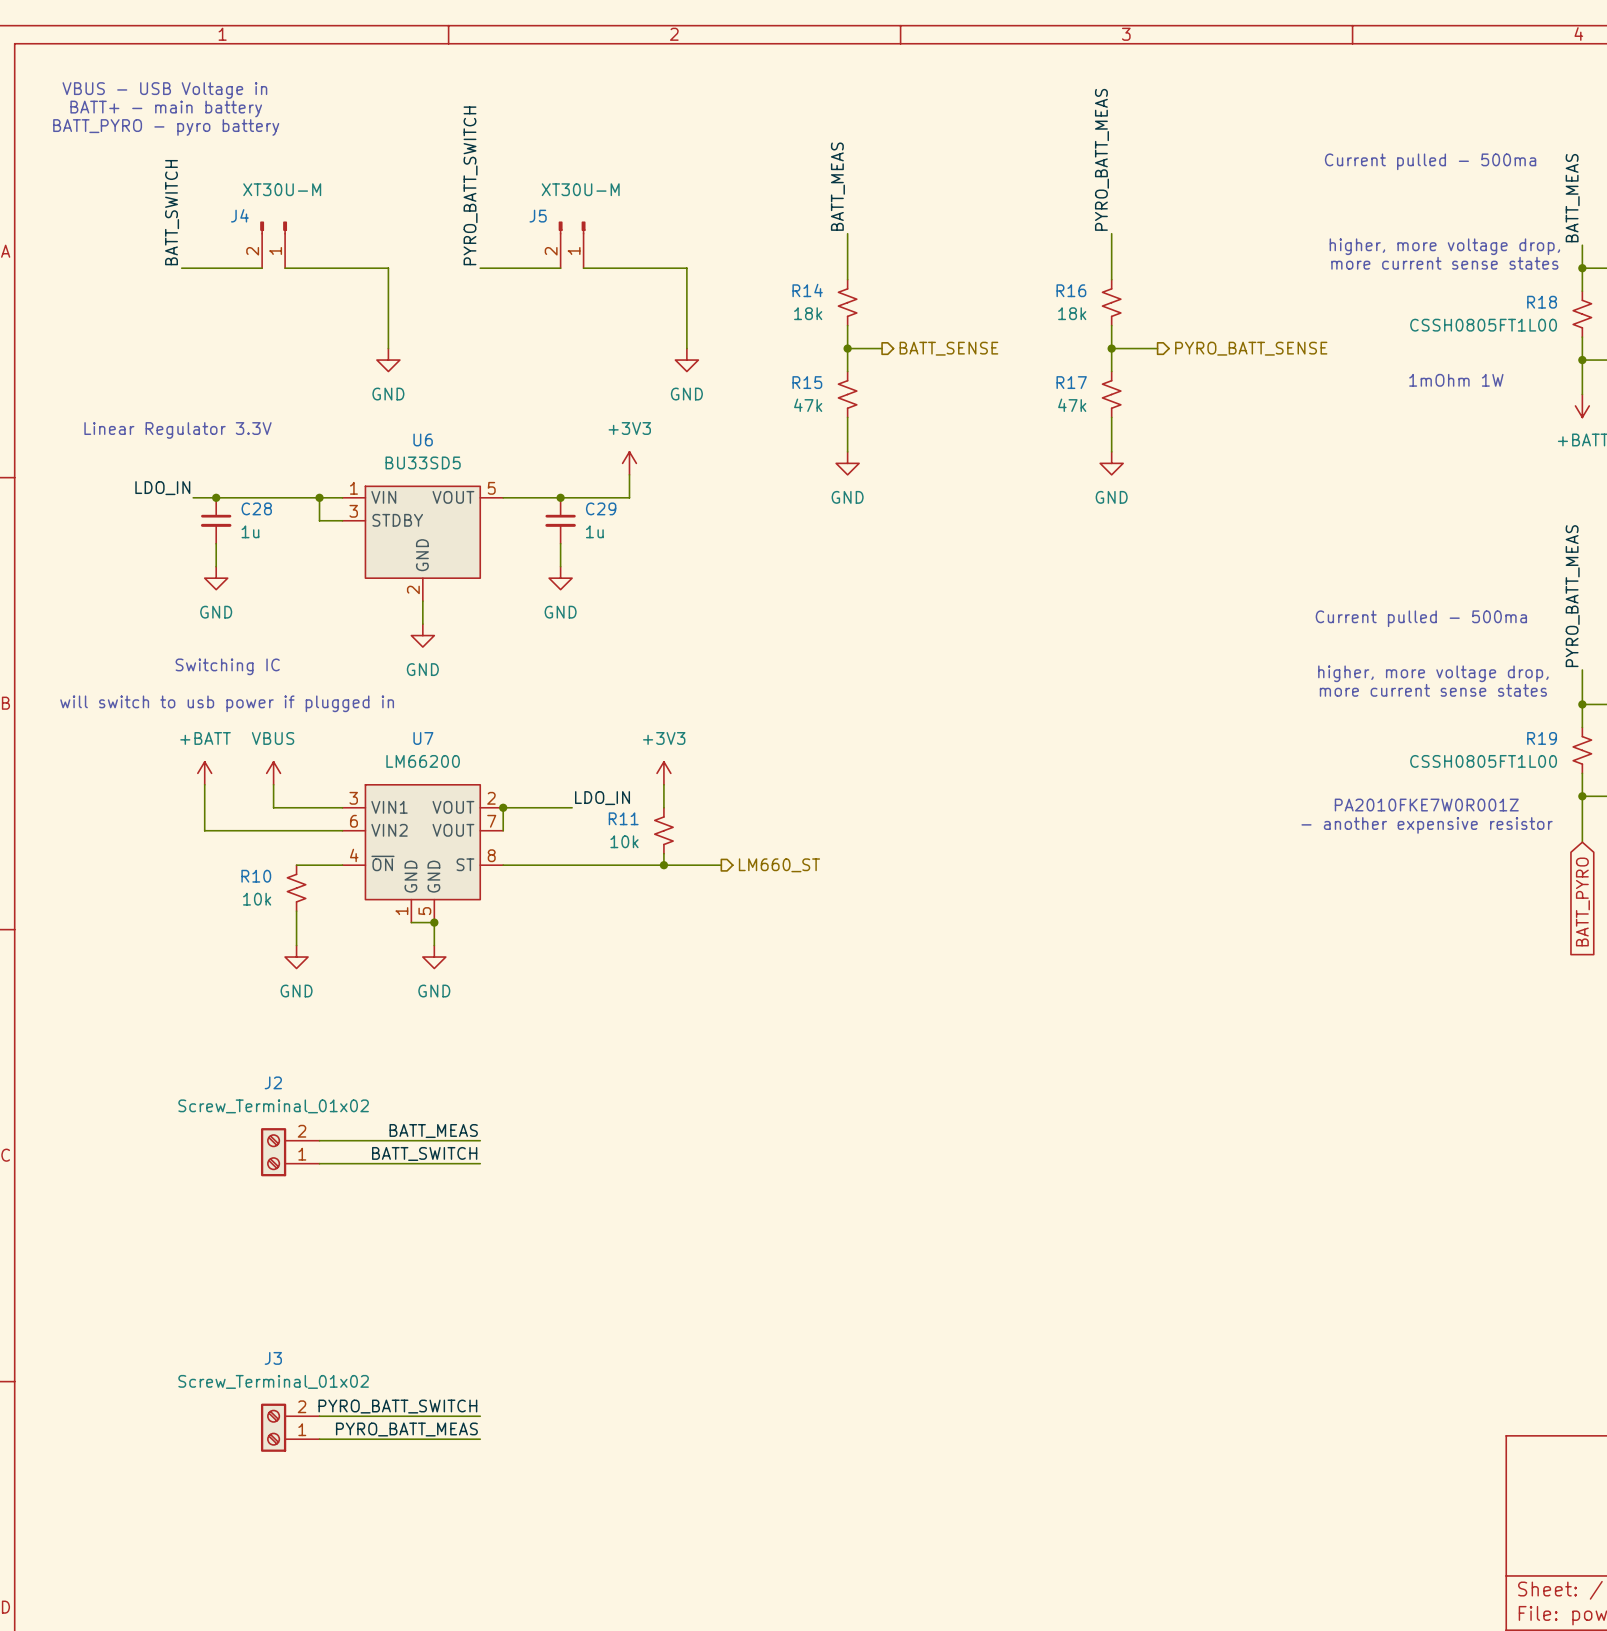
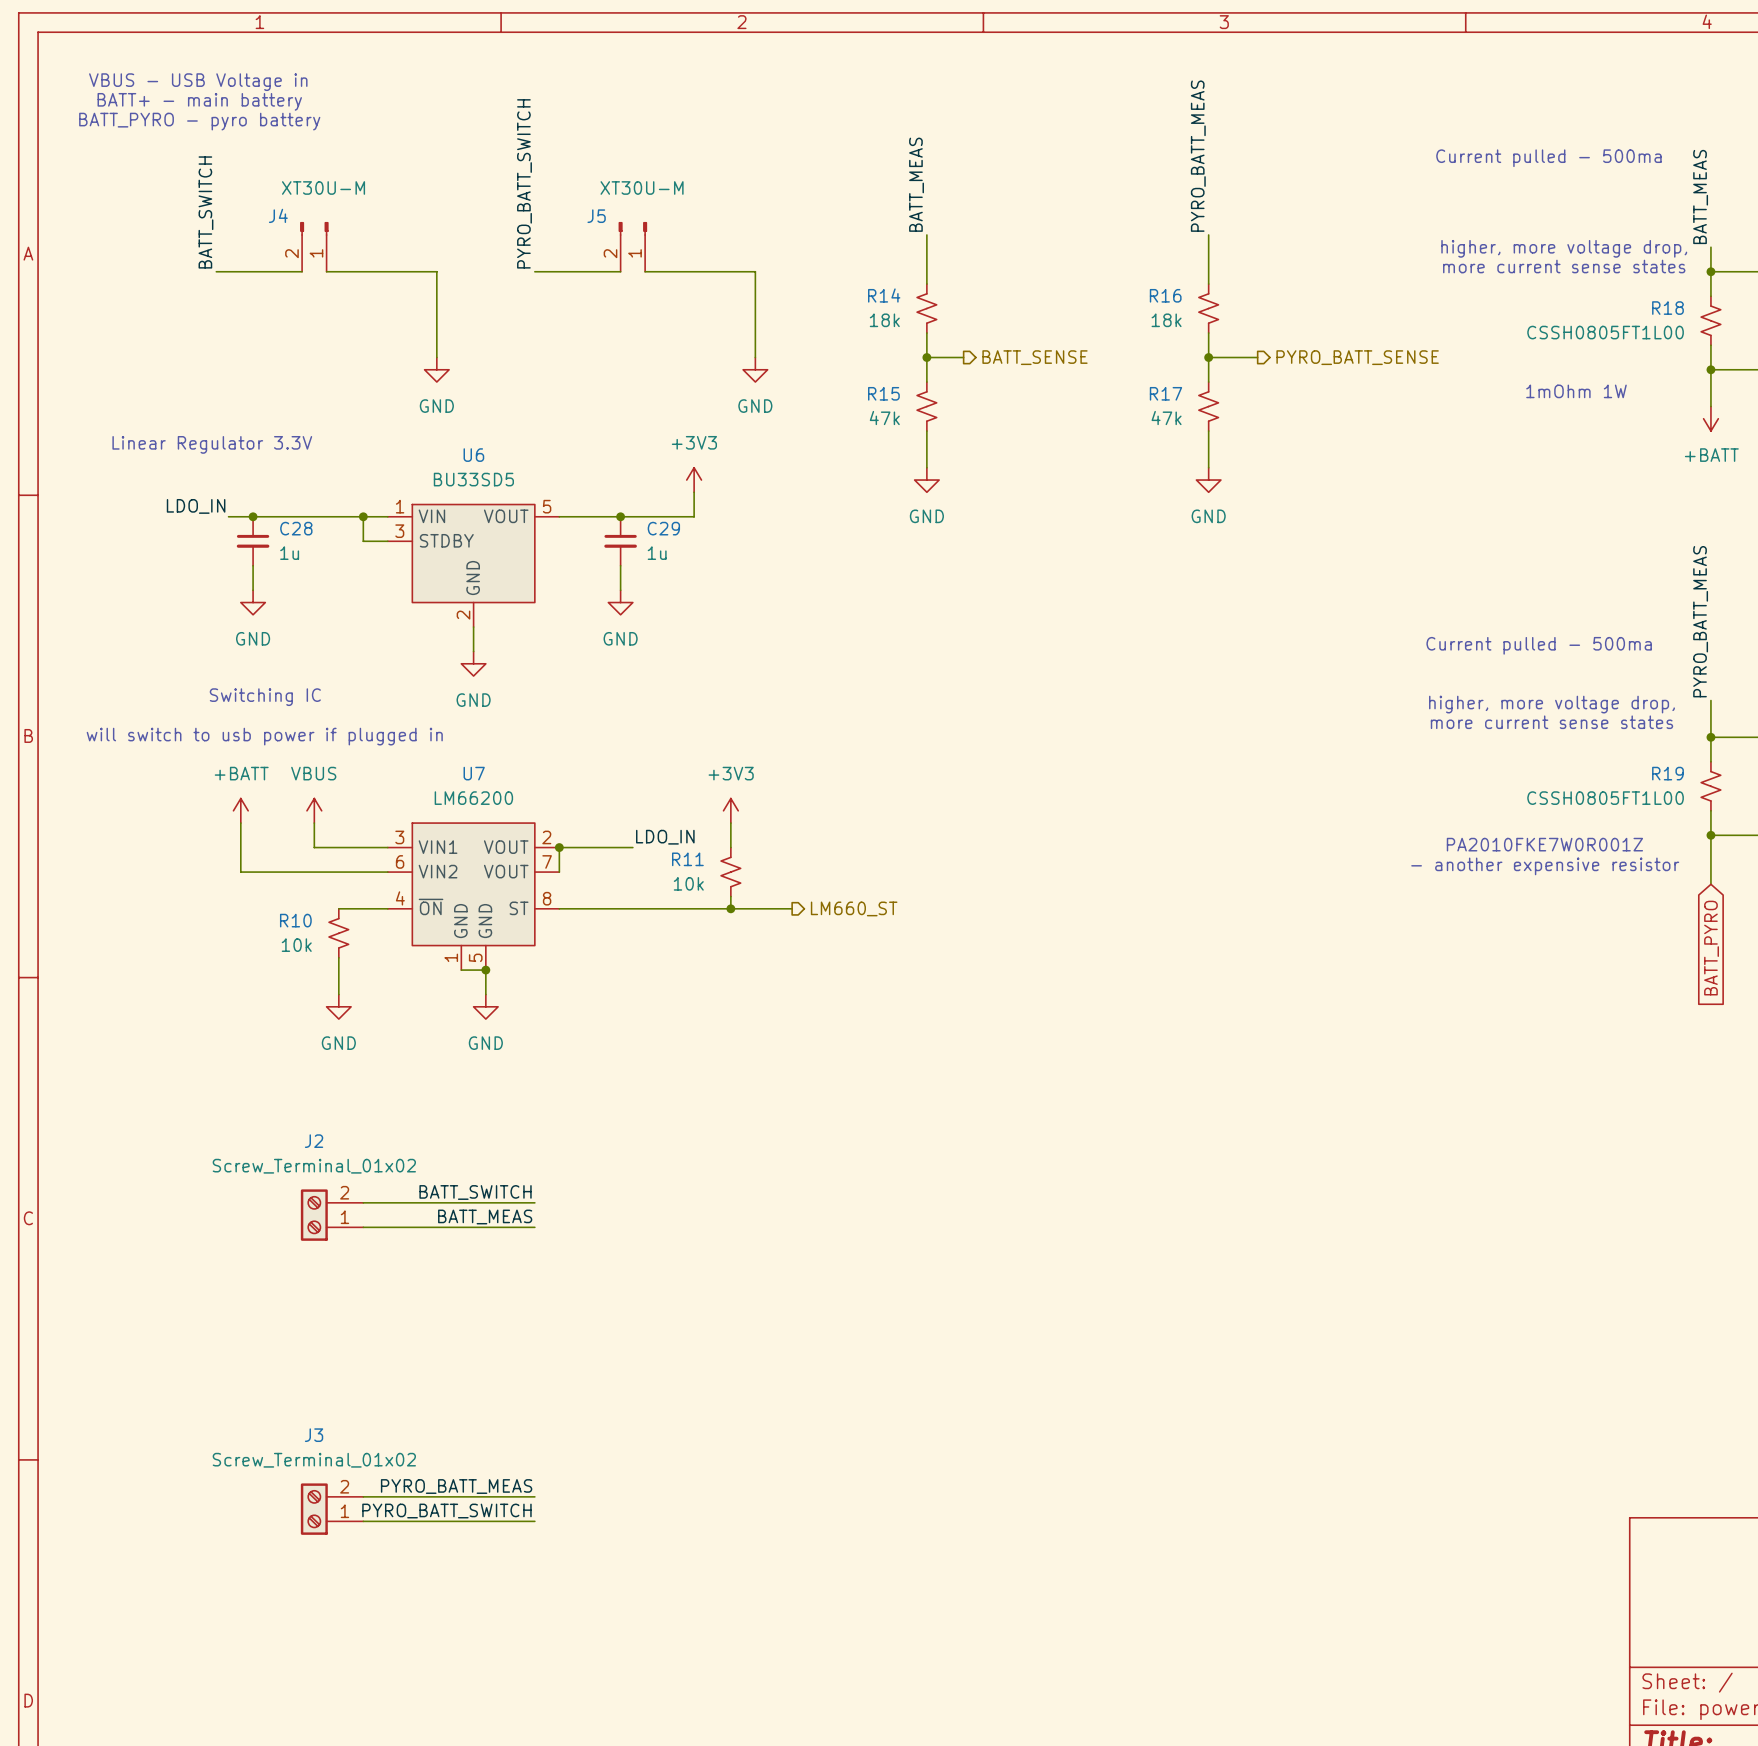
label: BATT_MEAS (433, 1131) -> BATT_SWITCH (475, 1192)
label: BATT_SWITCH (424, 1153) -> BATT_MEAS (485, 1217)
label: PYRO_BATT_SWITCH (397, 1406) -> PYRO_BATT_MEAS (456, 1486)
label: PYRO_BATT_MEAS (406, 1429) -> PYRO_BATT_SWITCH (446, 1511)

